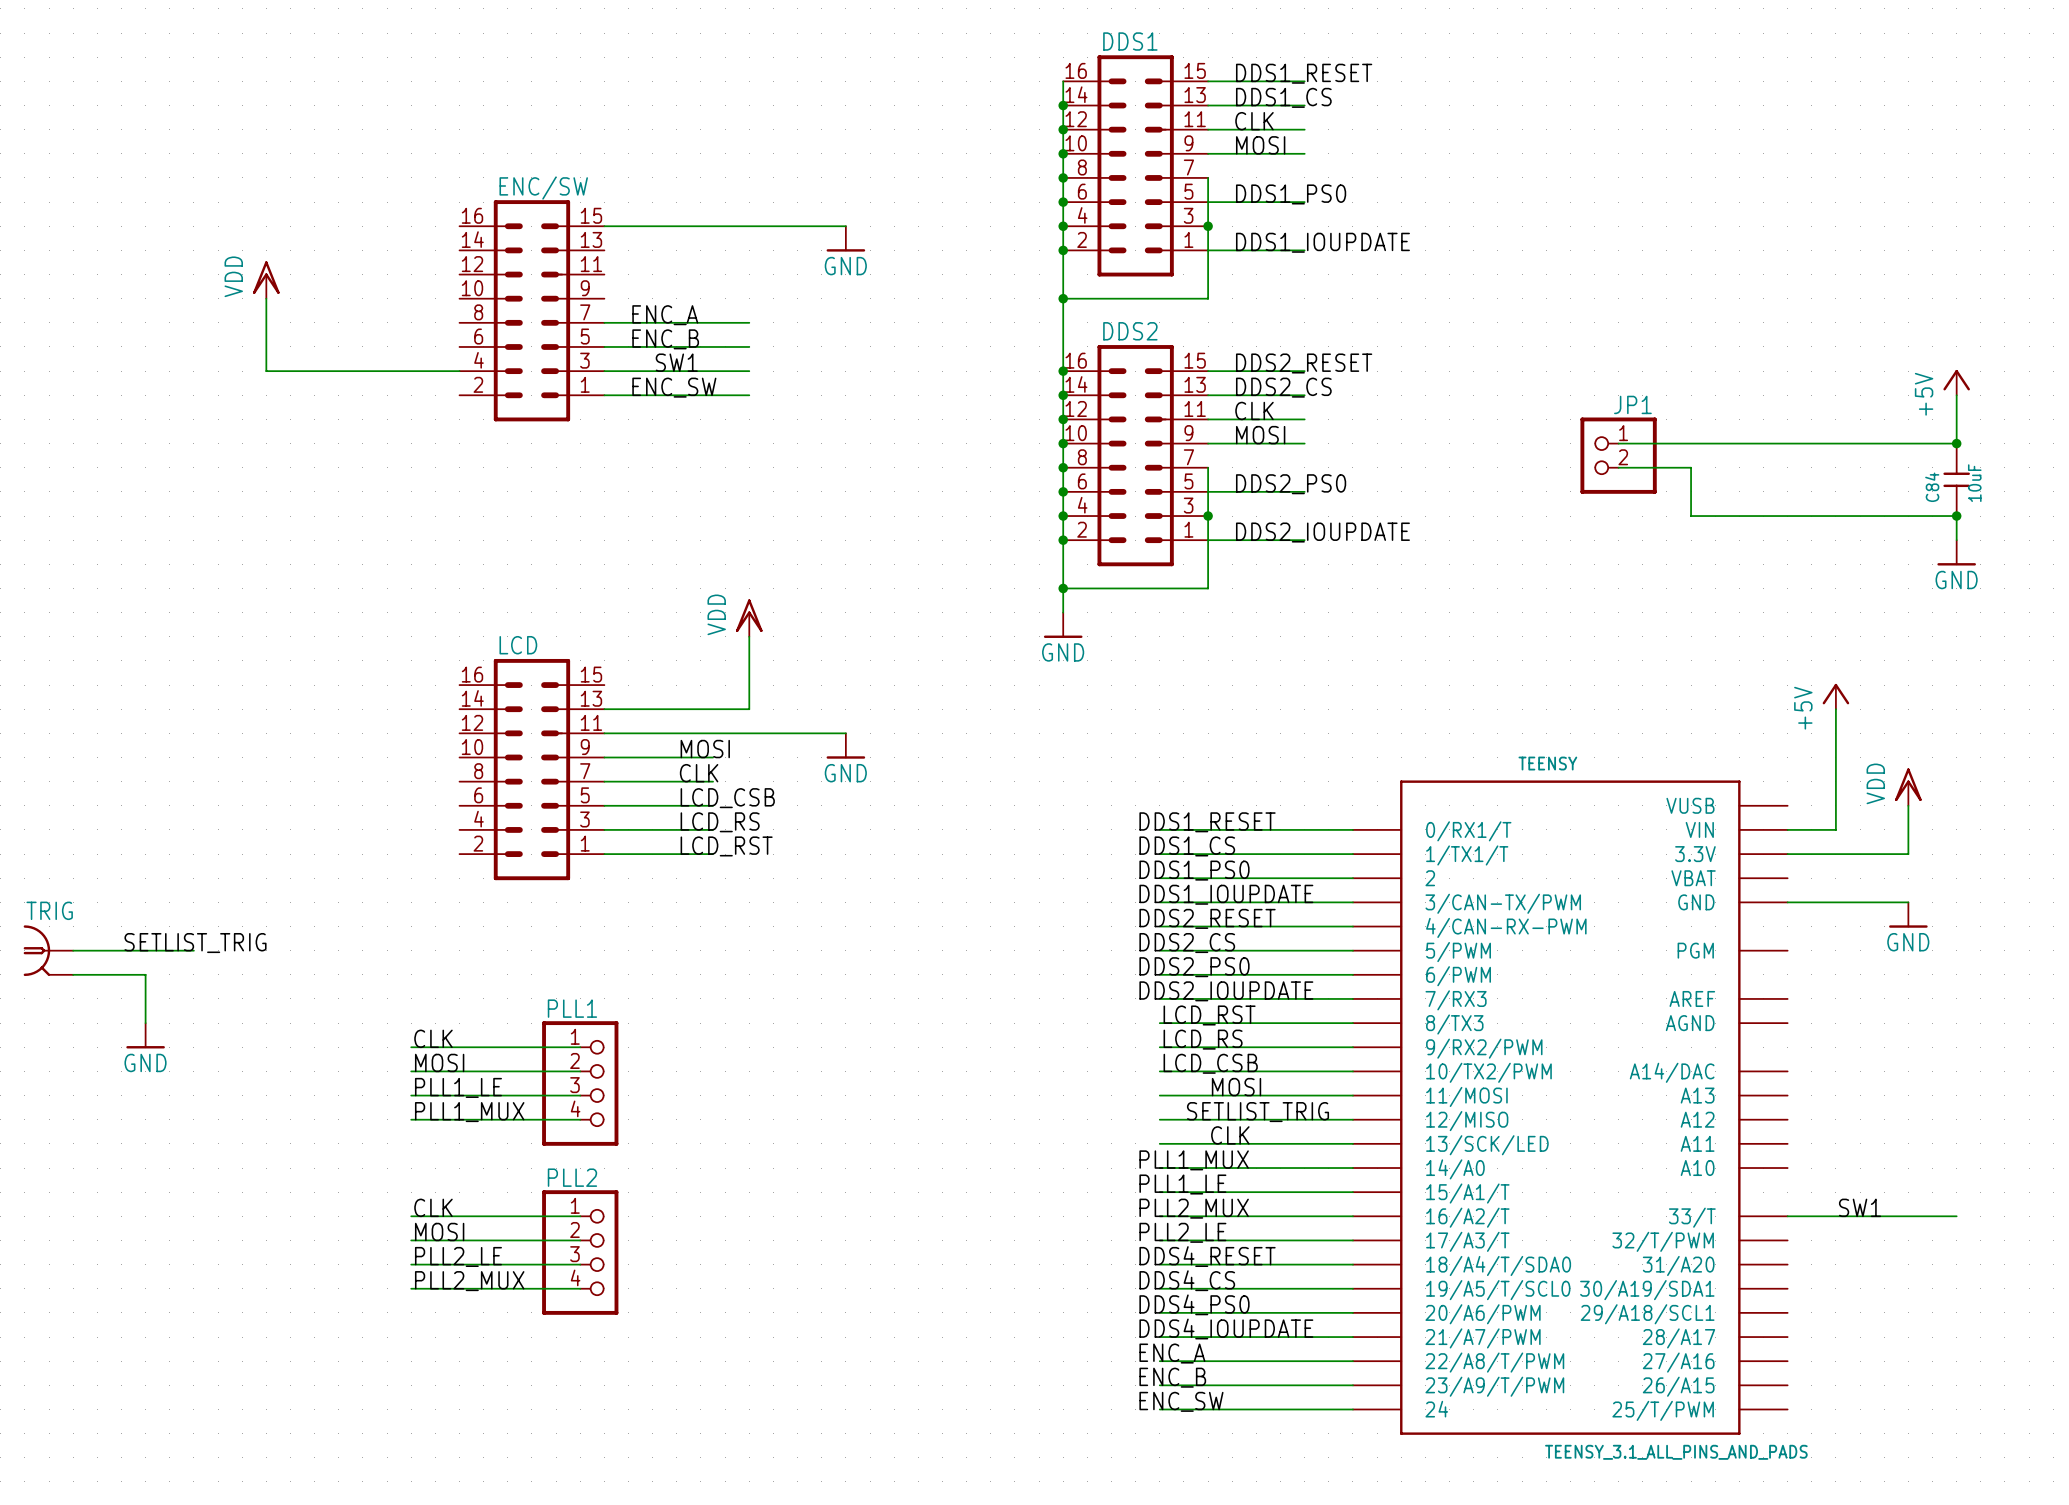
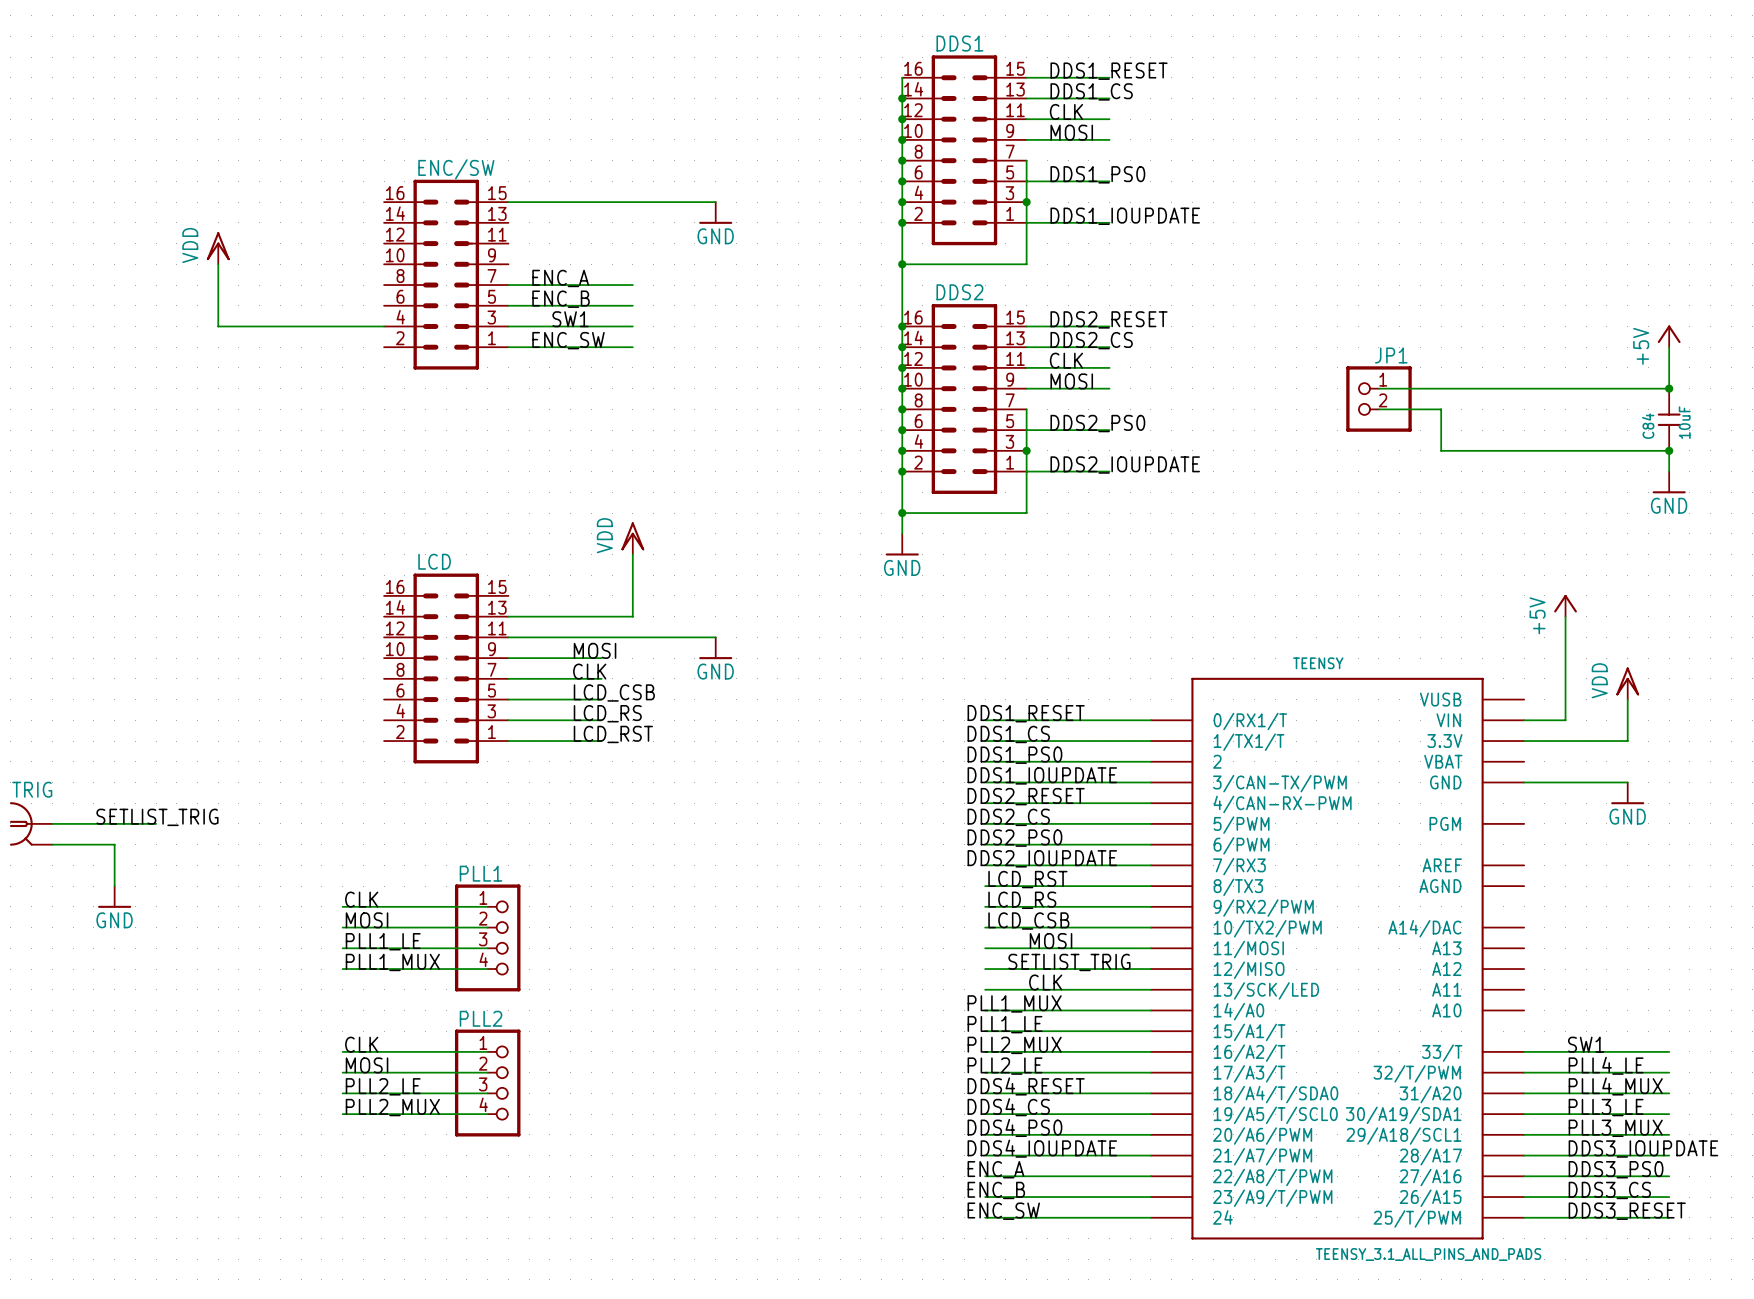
label: none -> PLL4_LE (1606, 1065)
wire: none -> (1524, 1072) (1669, 1072)
label: none -> PLL4_MUX (1615, 1086)
wire: none -> (1524, 1093) (1669, 1093)
label: none -> PLL3_LE (1606, 1107)
wire: none -> (1524, 1114) (1669, 1114)
label: none -> PLL3_MUX (1615, 1128)
wire: none -> (1524, 1134) (1669, 1134)
label: none -> DDS3_IOUPDATE (1643, 1149)
wire: none -> (1524, 1155) (1669, 1155)
label: none -> DDS3_PS0 (1616, 1169)
wire: none -> (1524, 1176) (1669, 1176)
label: none -> DDS3_CS (1609, 1190)
wire: none -> (1524, 1197) (1669, 1197)
label: none -> DDS3_RESET (1627, 1211)
wire: none -> (1524, 1217) (1669, 1217)

